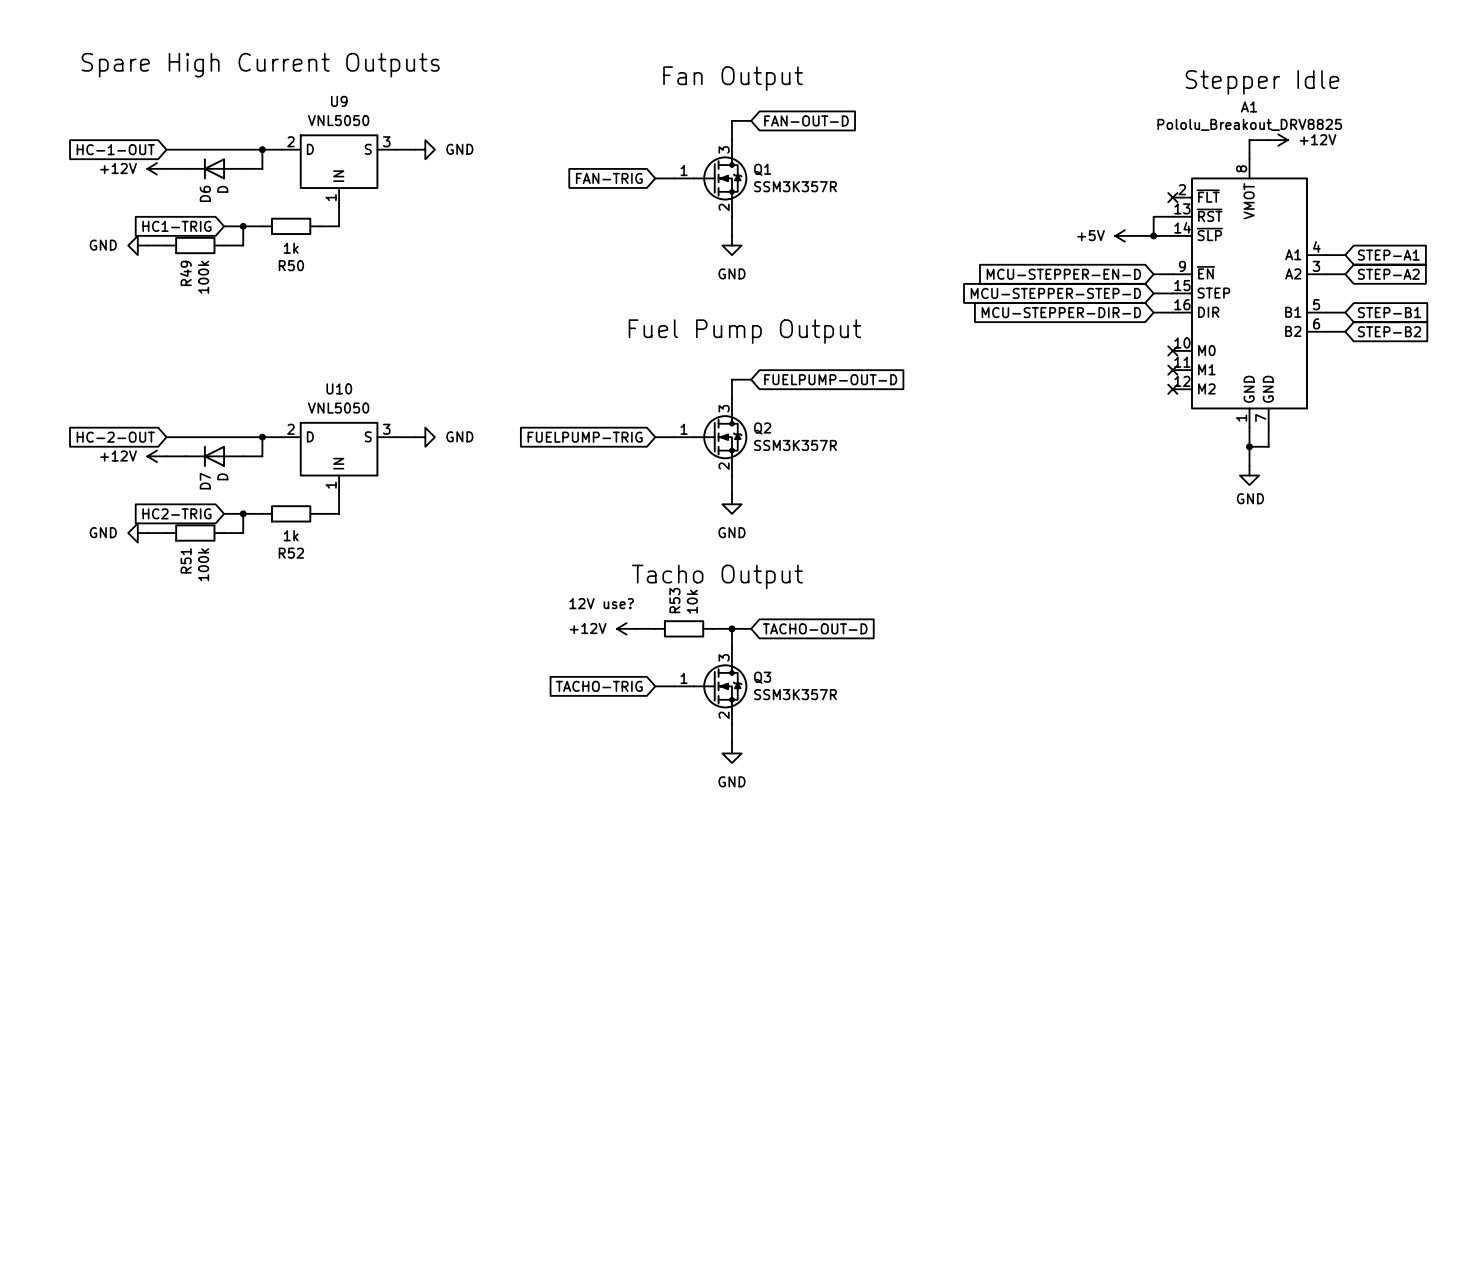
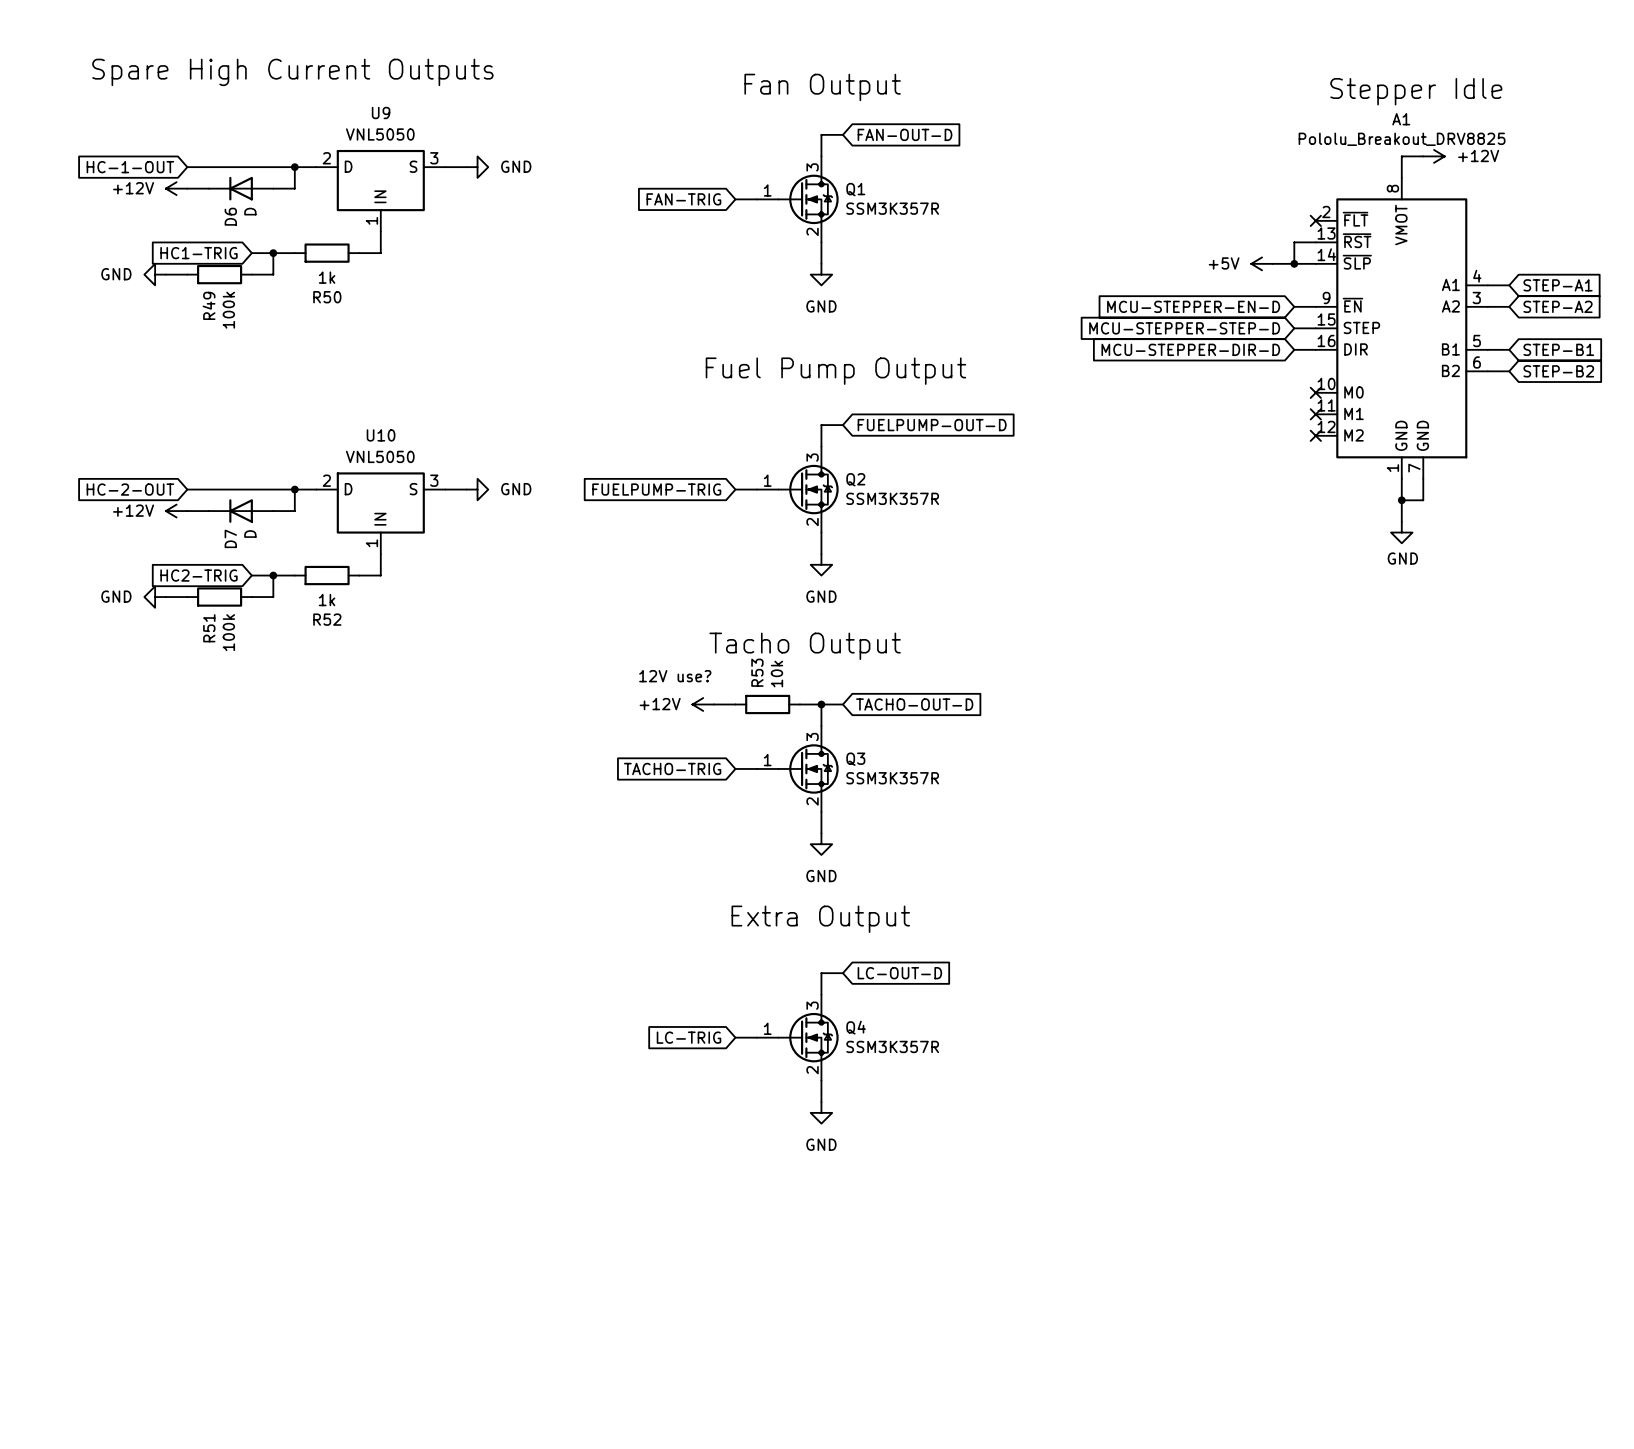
text: none -> Extra Output (820, 919)
wire: none -> (842, 973) (821, 973) (821, 994)
global label: none -> LC-OUT-D (899, 973)
global label: none -> LC-TRIG (689, 1037)
wire: none -> (735, 1037) (756, 1037)
Q4: none -> SSM3K357R (797, 1037)
wire: none -> (821, 1080) (821, 1102)
power symbol: none -> GND (821, 1112)

